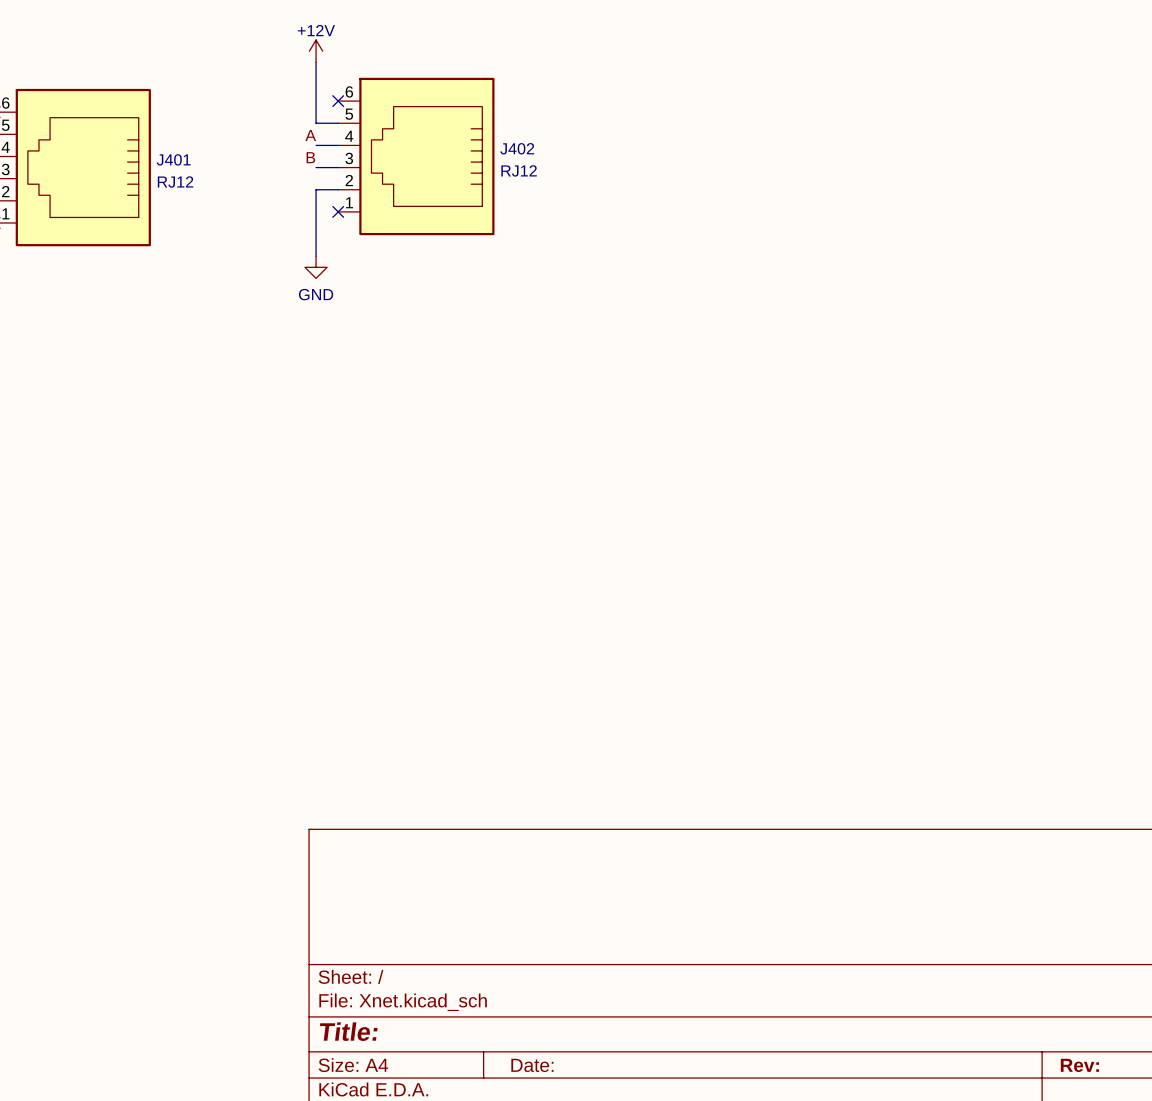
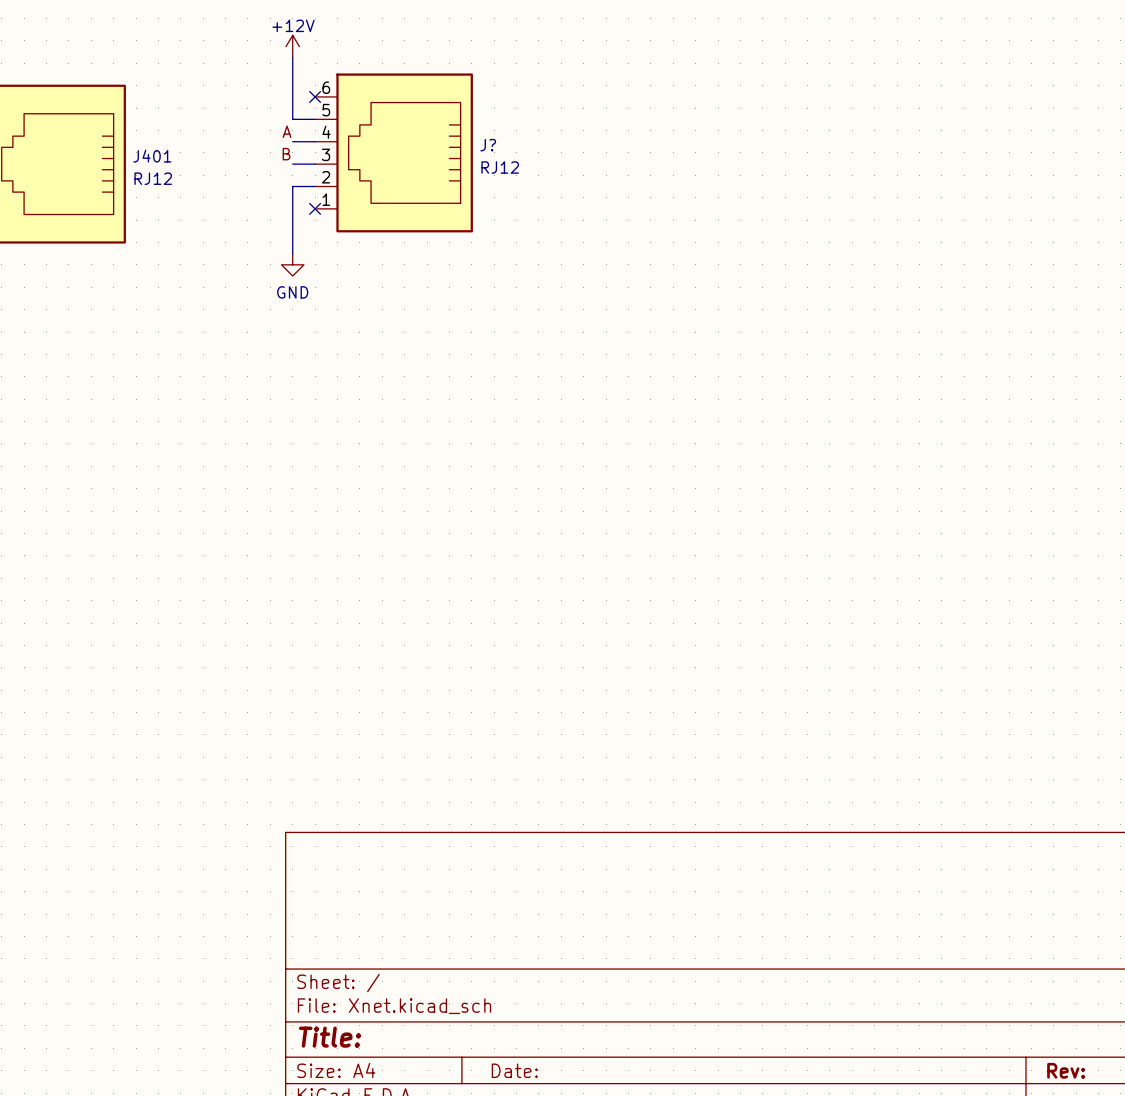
J402 name: J402 (517, 148) -> J? (488, 145)

